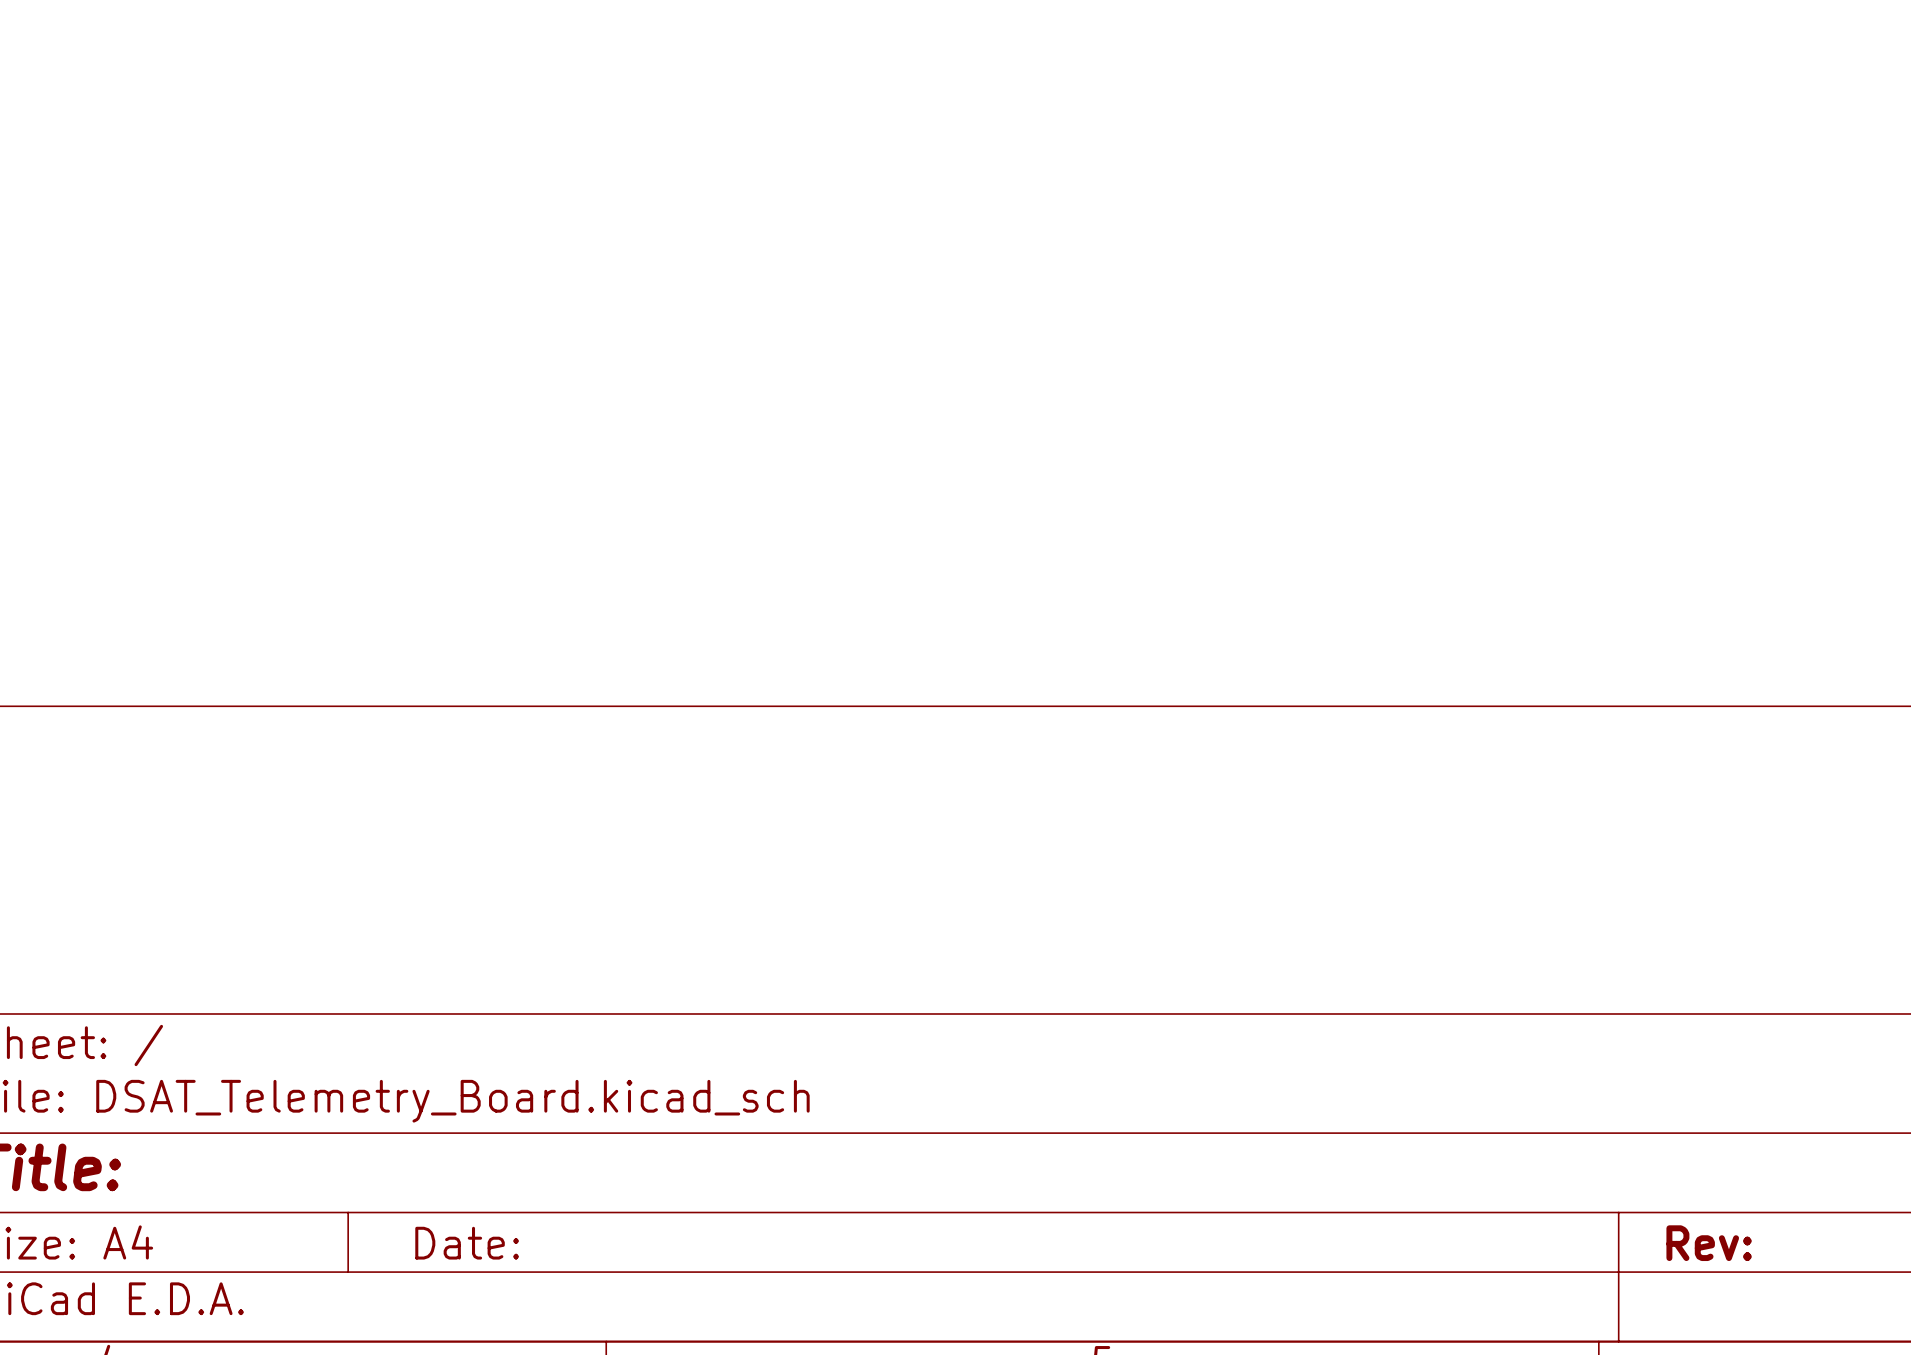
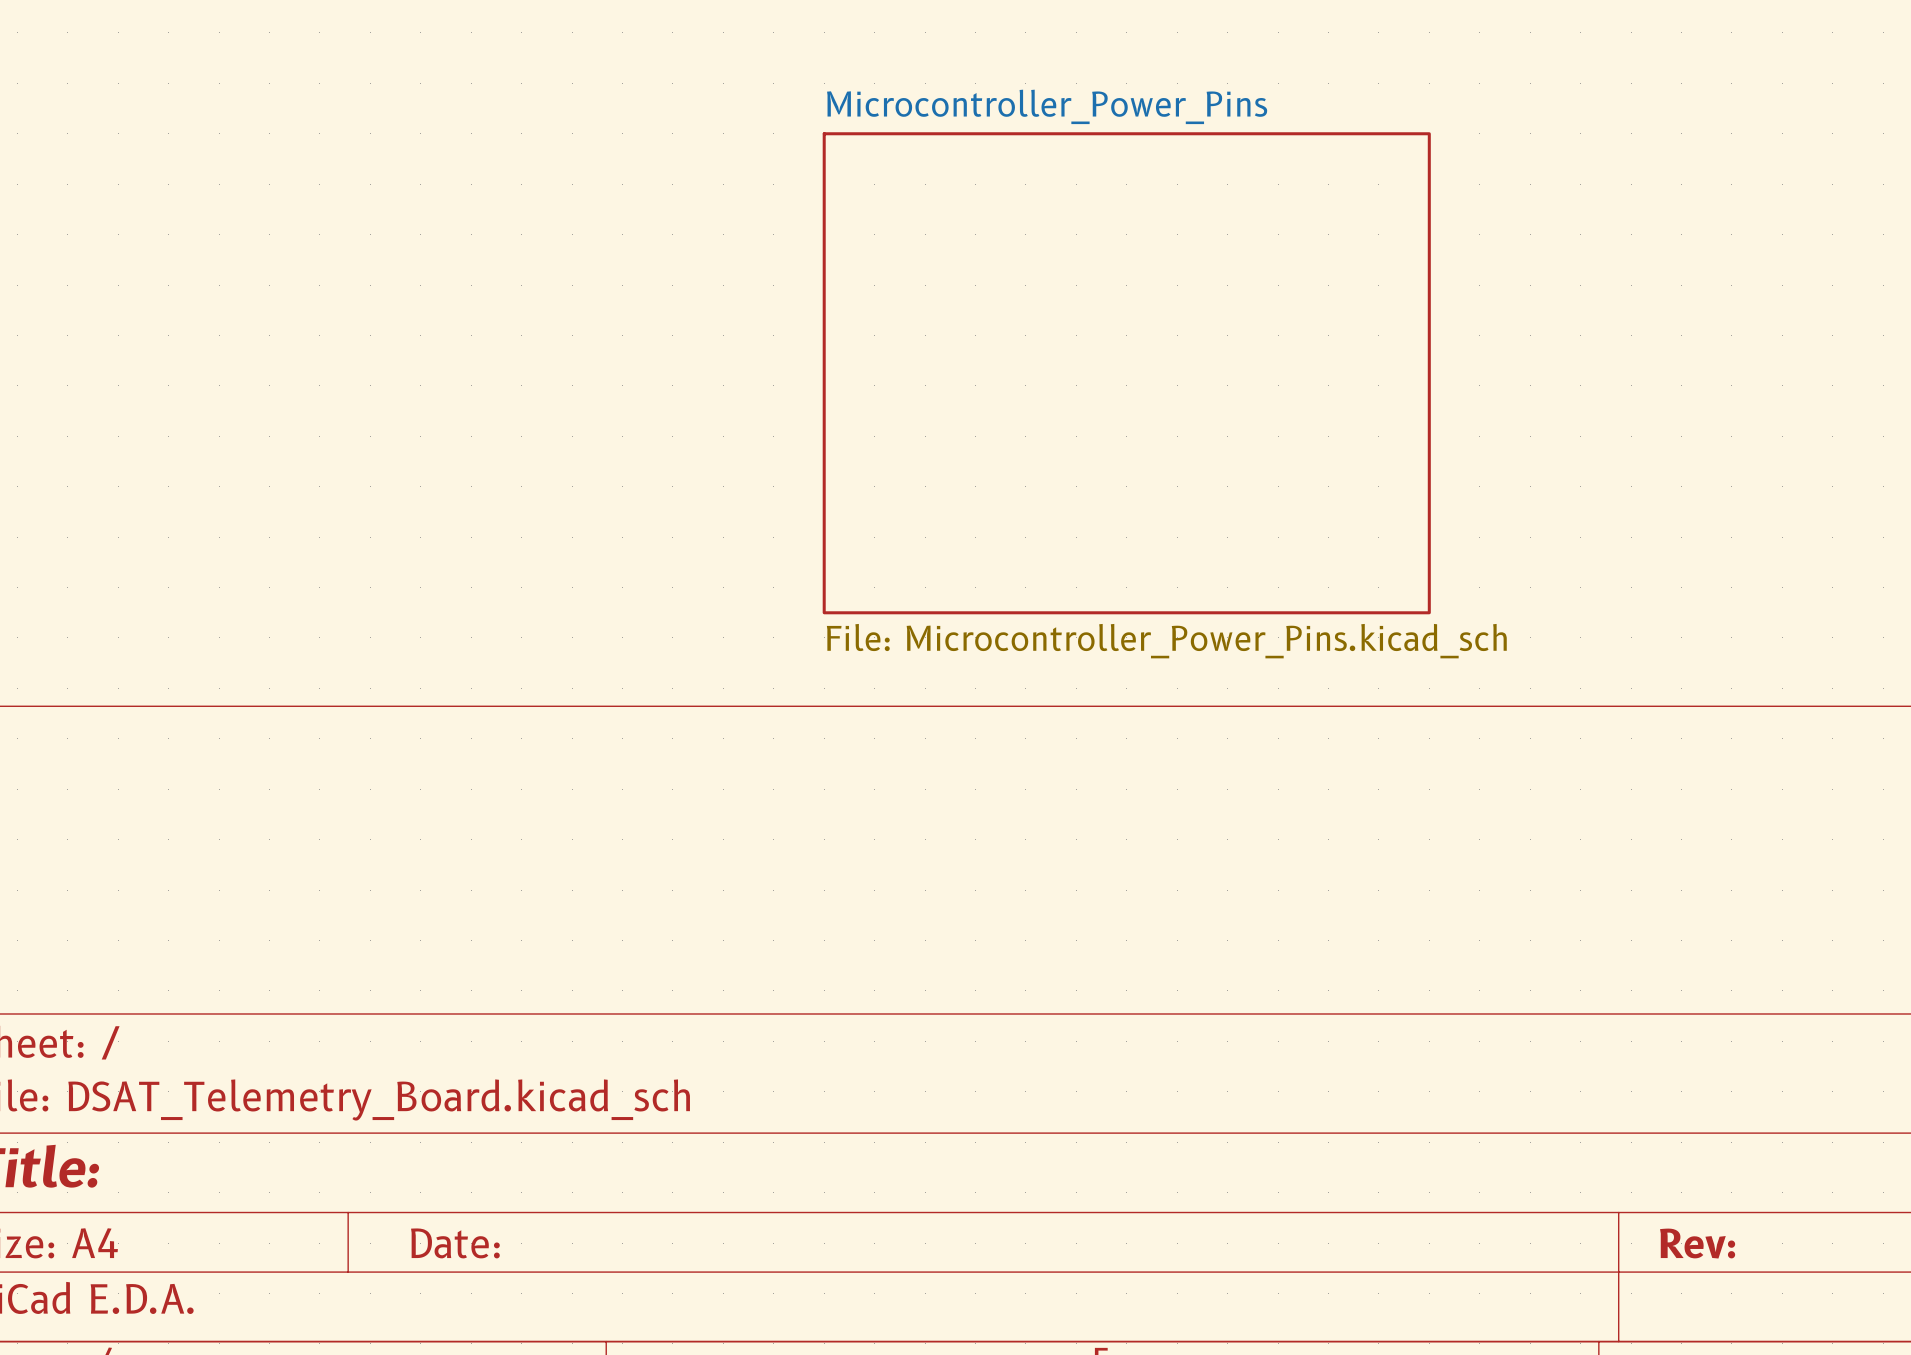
sheet Microcontroller_Power_Pins: none -> File: Microcontroller_Power_Pins.kicad_sch (1126, 373)

